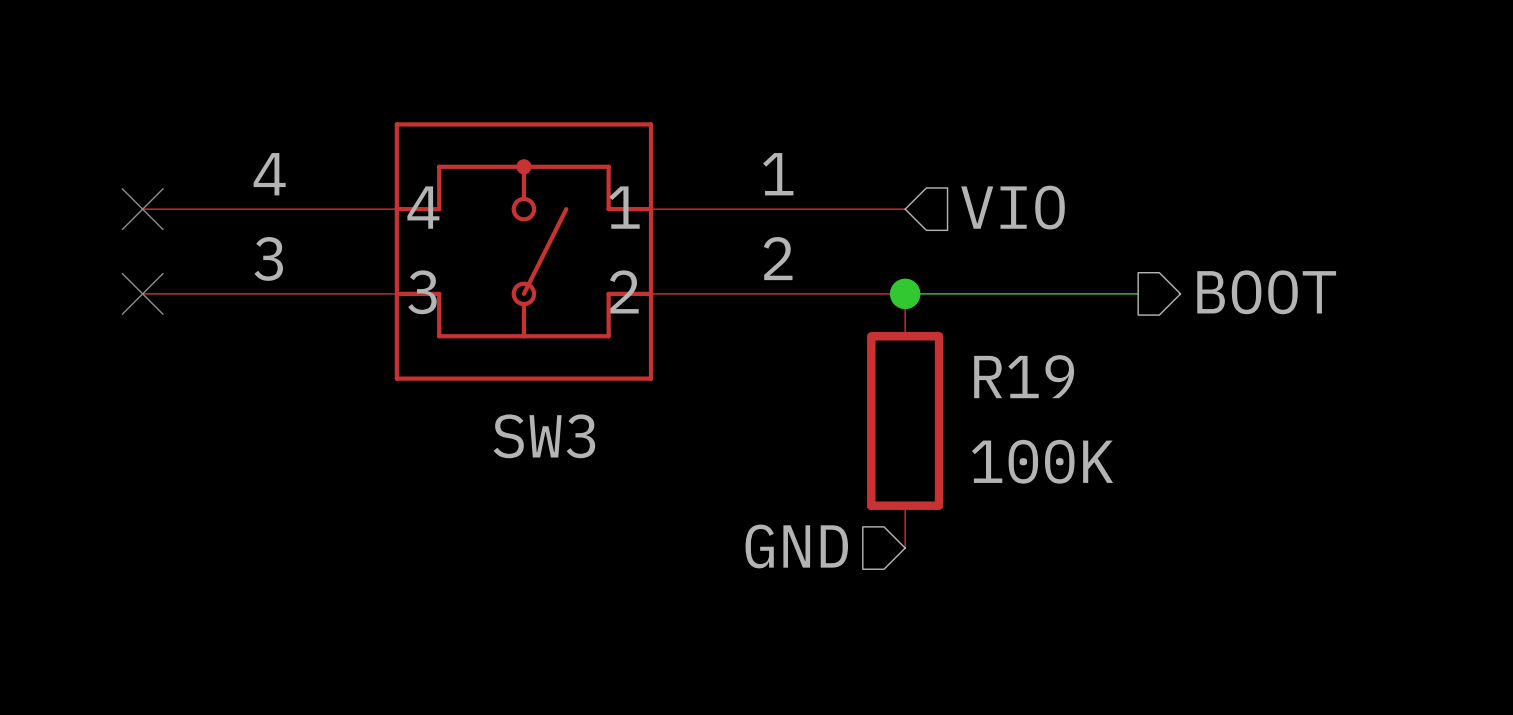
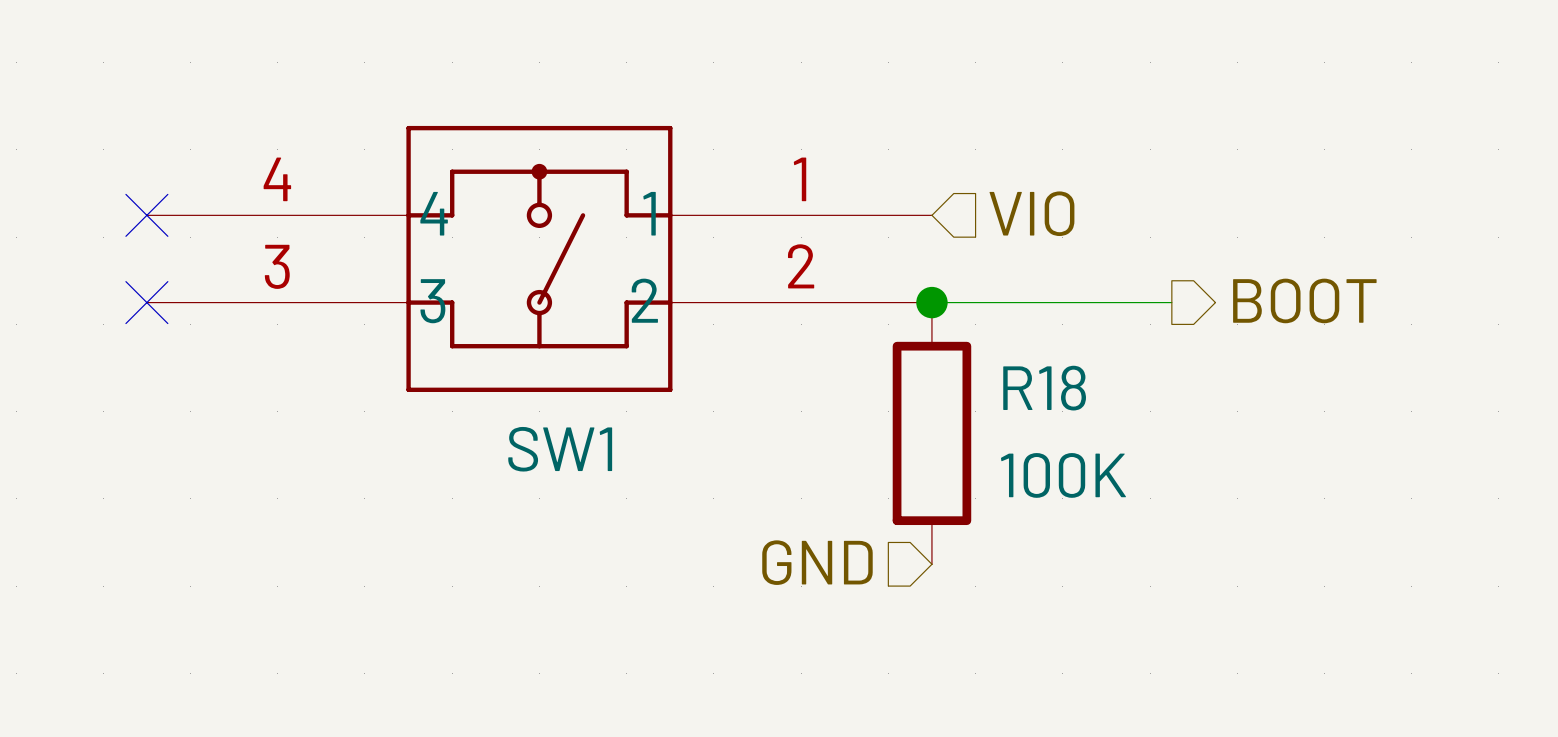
R19 name: R19 (1024, 376) -> R18 (1044, 388)
SW3 name: SW3 (544, 436) -> SW1 (560, 449)

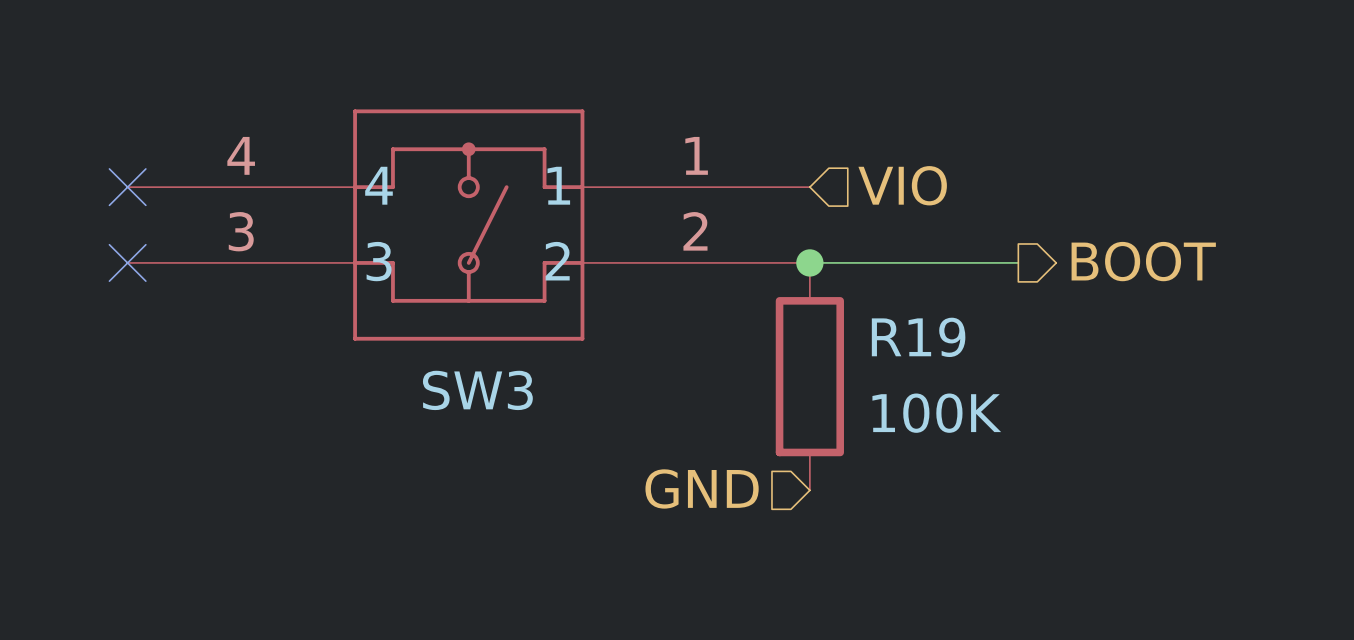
R18 name: R18 (1044, 388) -> R19 (918, 337)
SW1 name: SW1 (560, 449) -> SW3 (477, 390)

